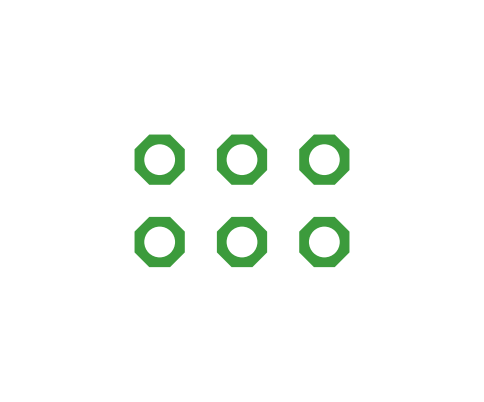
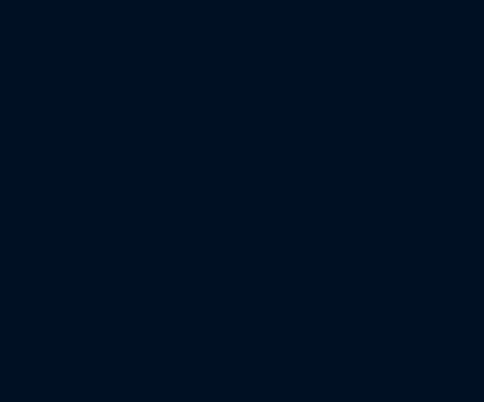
part: (242, 200) -> none

